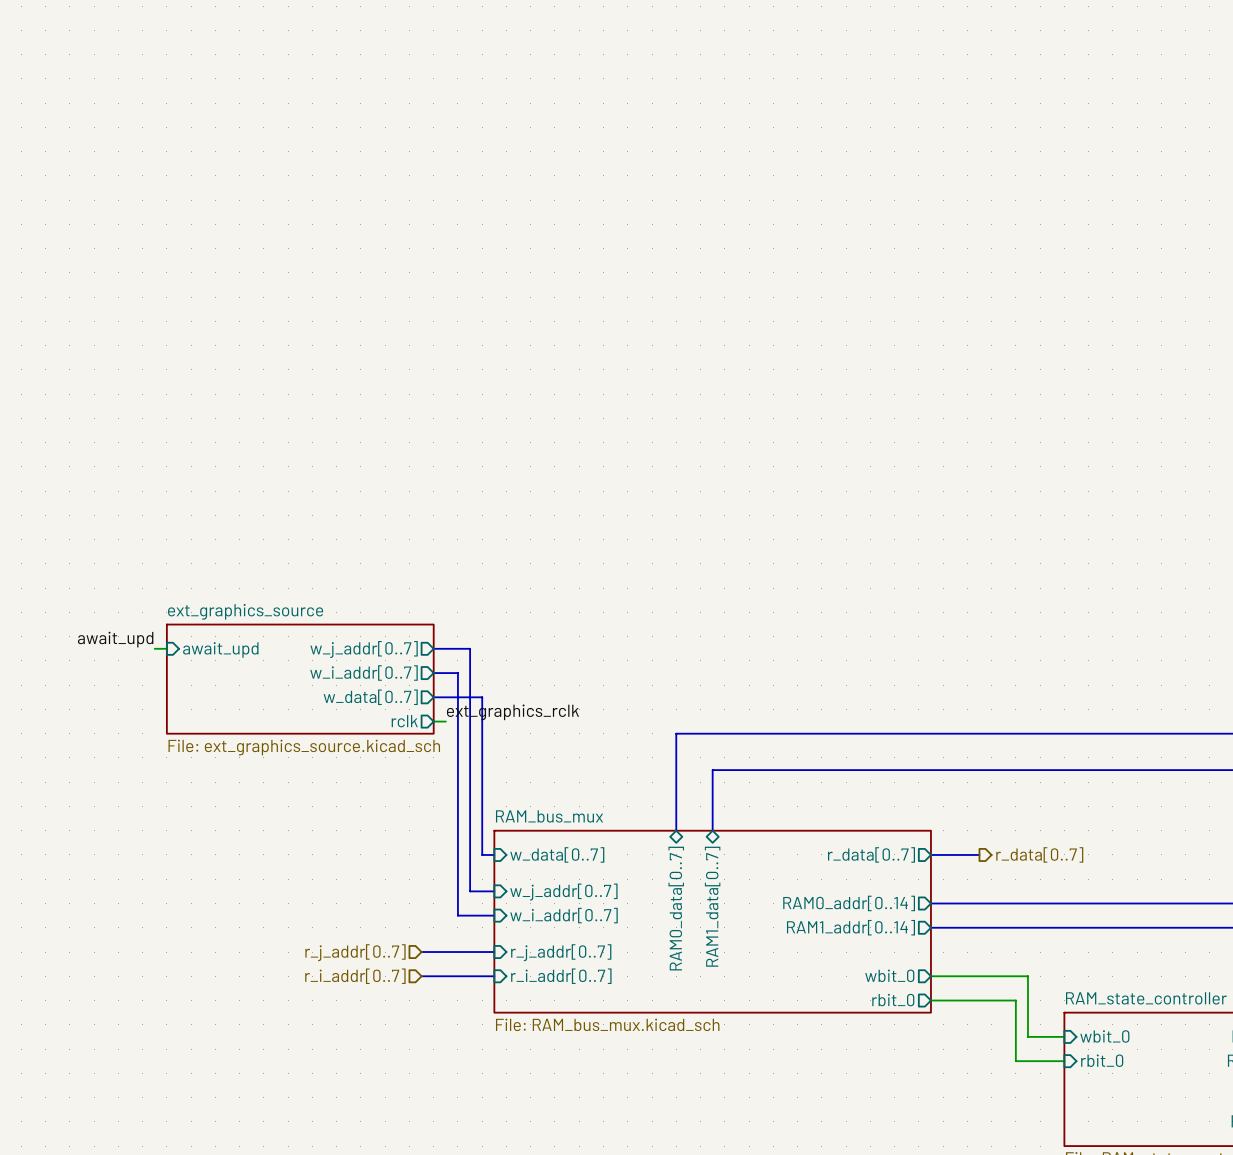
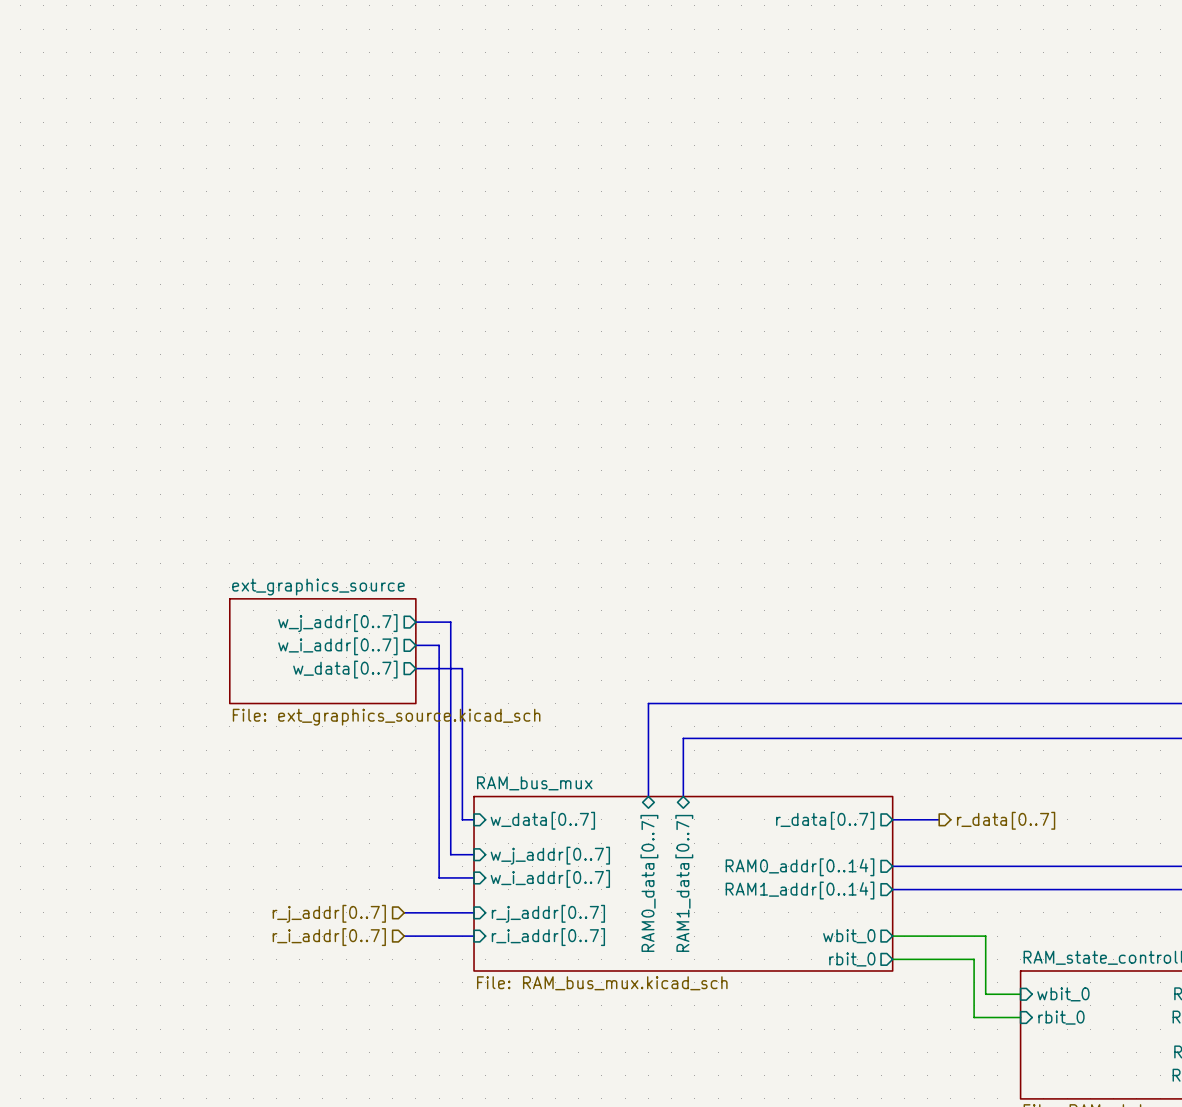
label: await_upd (115, 639) -> none
wire: (154, 648) (166, 648) -> none
sheet pin: await_upd (220, 649) -> none
sheet ext_graphics_source: File: ext_graphics_source.kicad_sch (300, 679) -> none
sheet ext_graphics_source: none -> File: ext_graphics_source.kicad_sch (322, 651)
label: ext_graphics_rclk (512, 712) -> none
sheet pin: rclk (404, 721) -> none
wire: (433, 721) (445, 721) -> none

